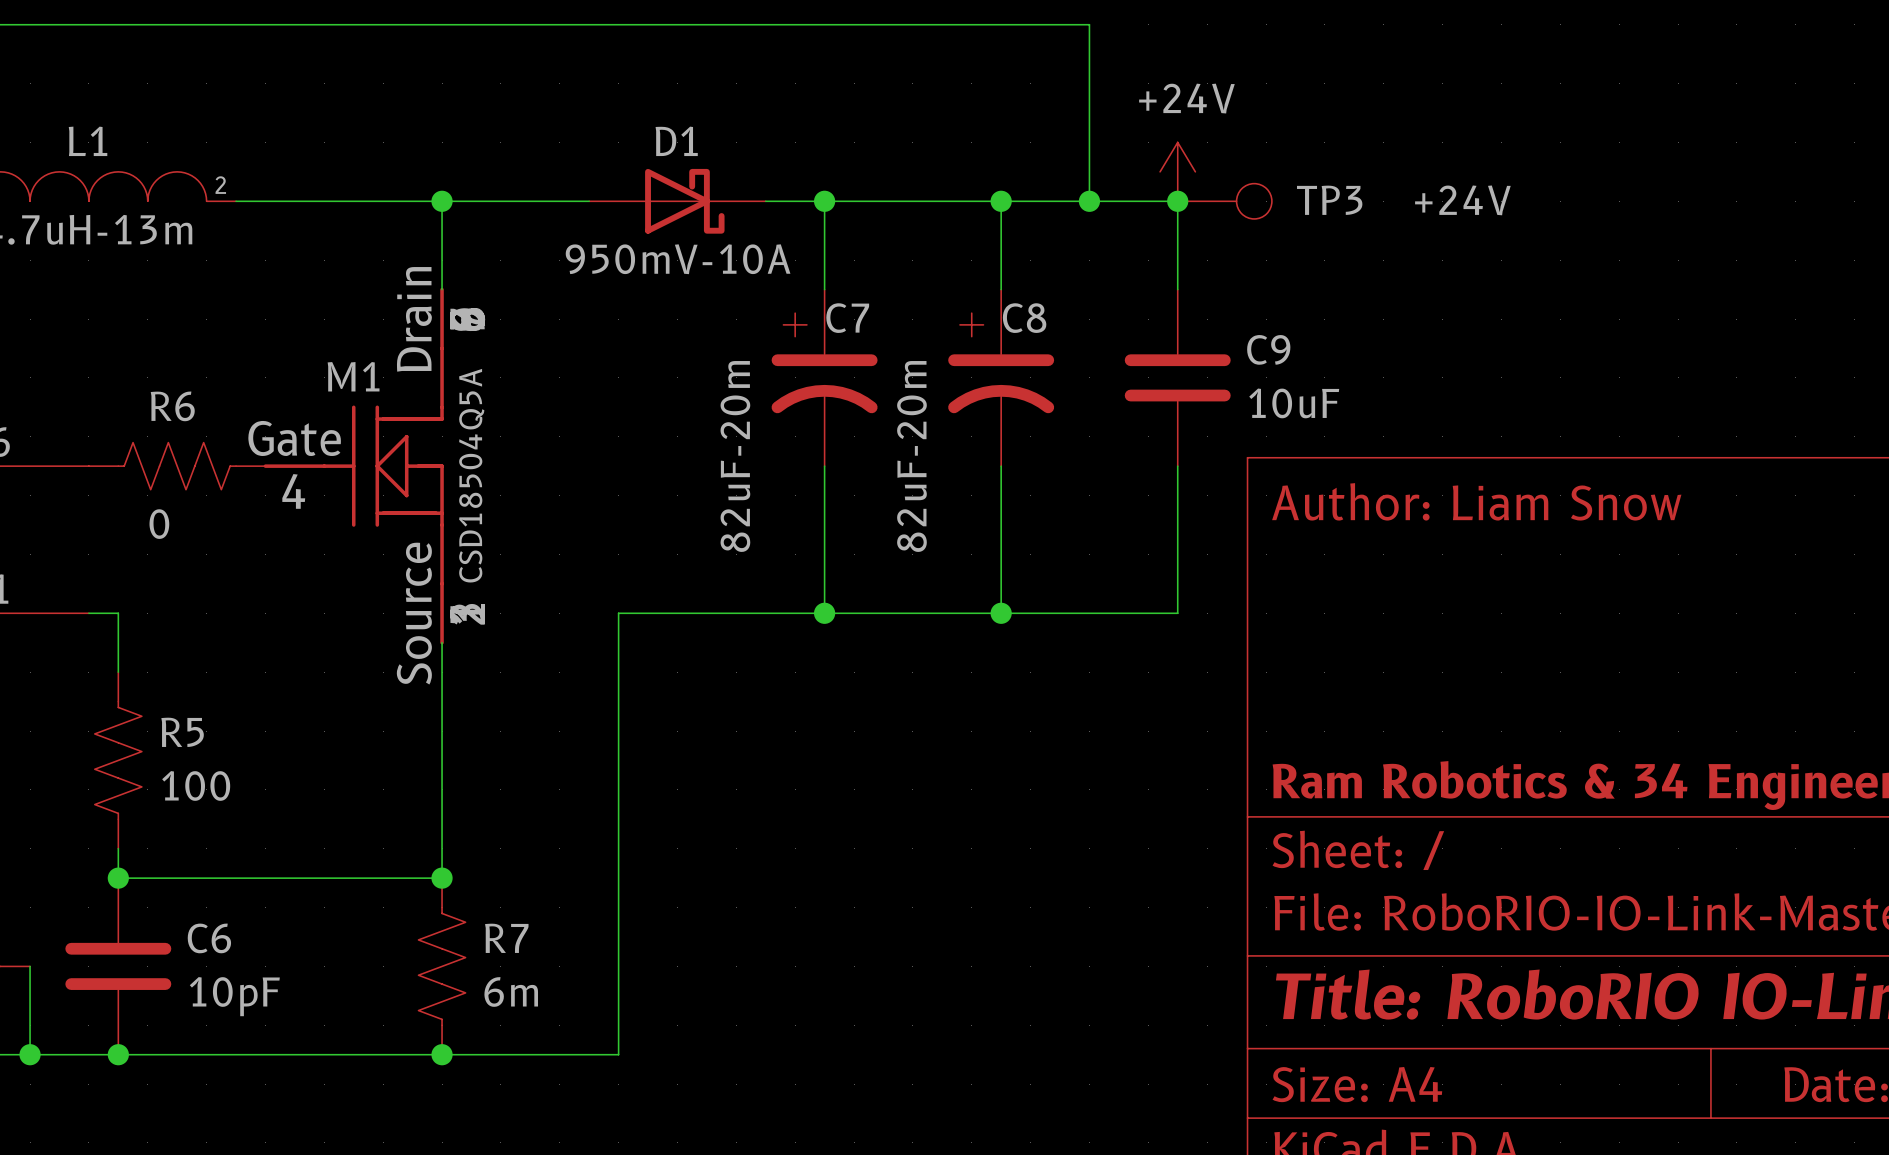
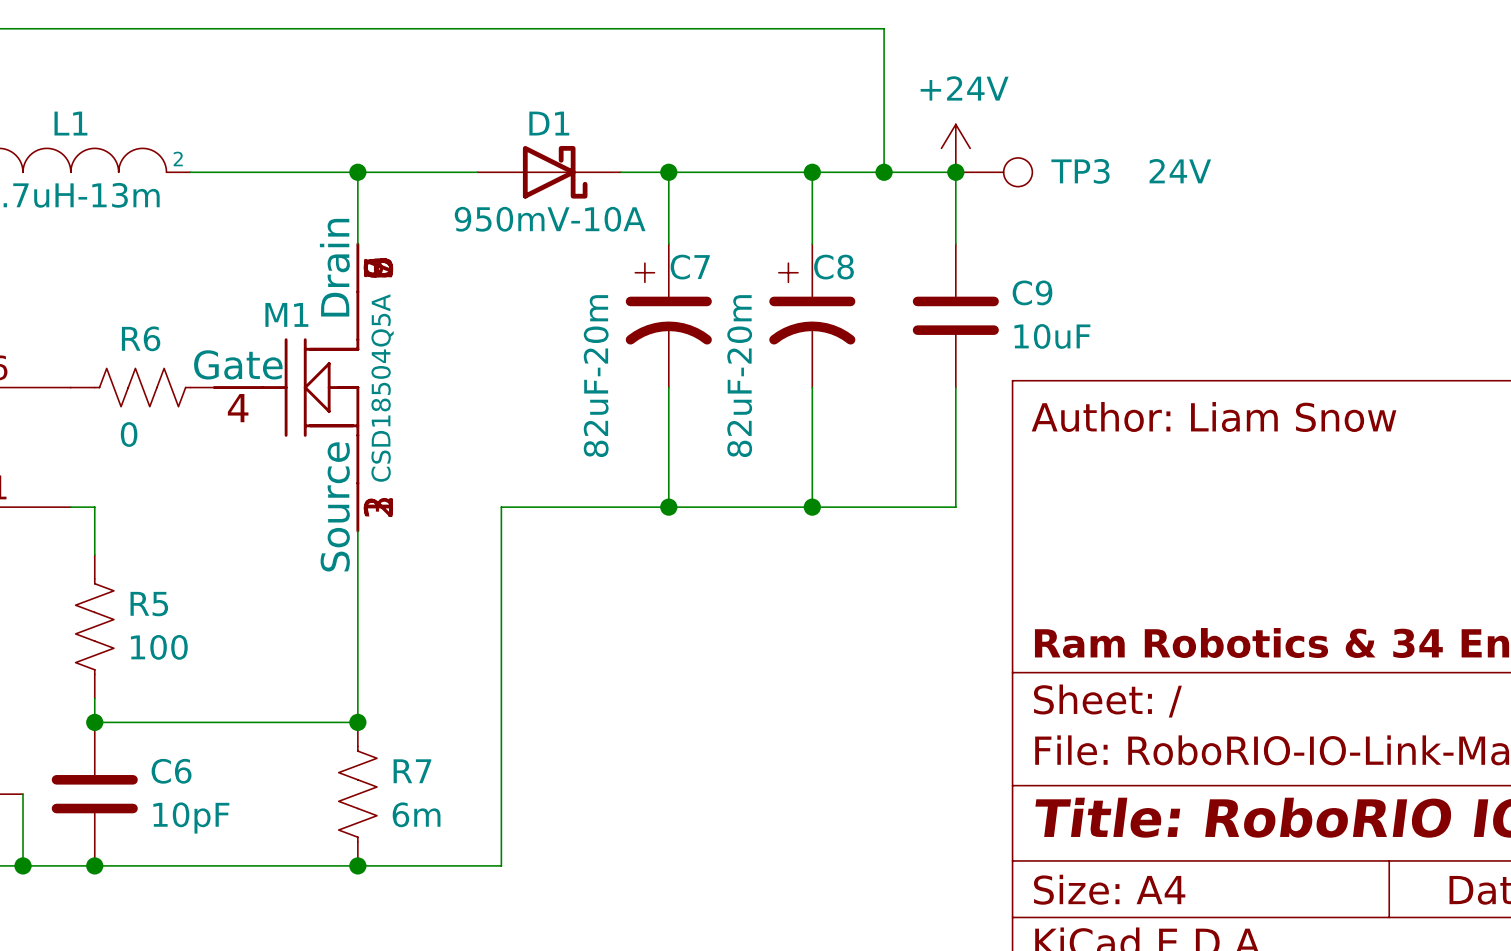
TP3 value: +24V (1462, 200) -> 24V (1180, 171)

